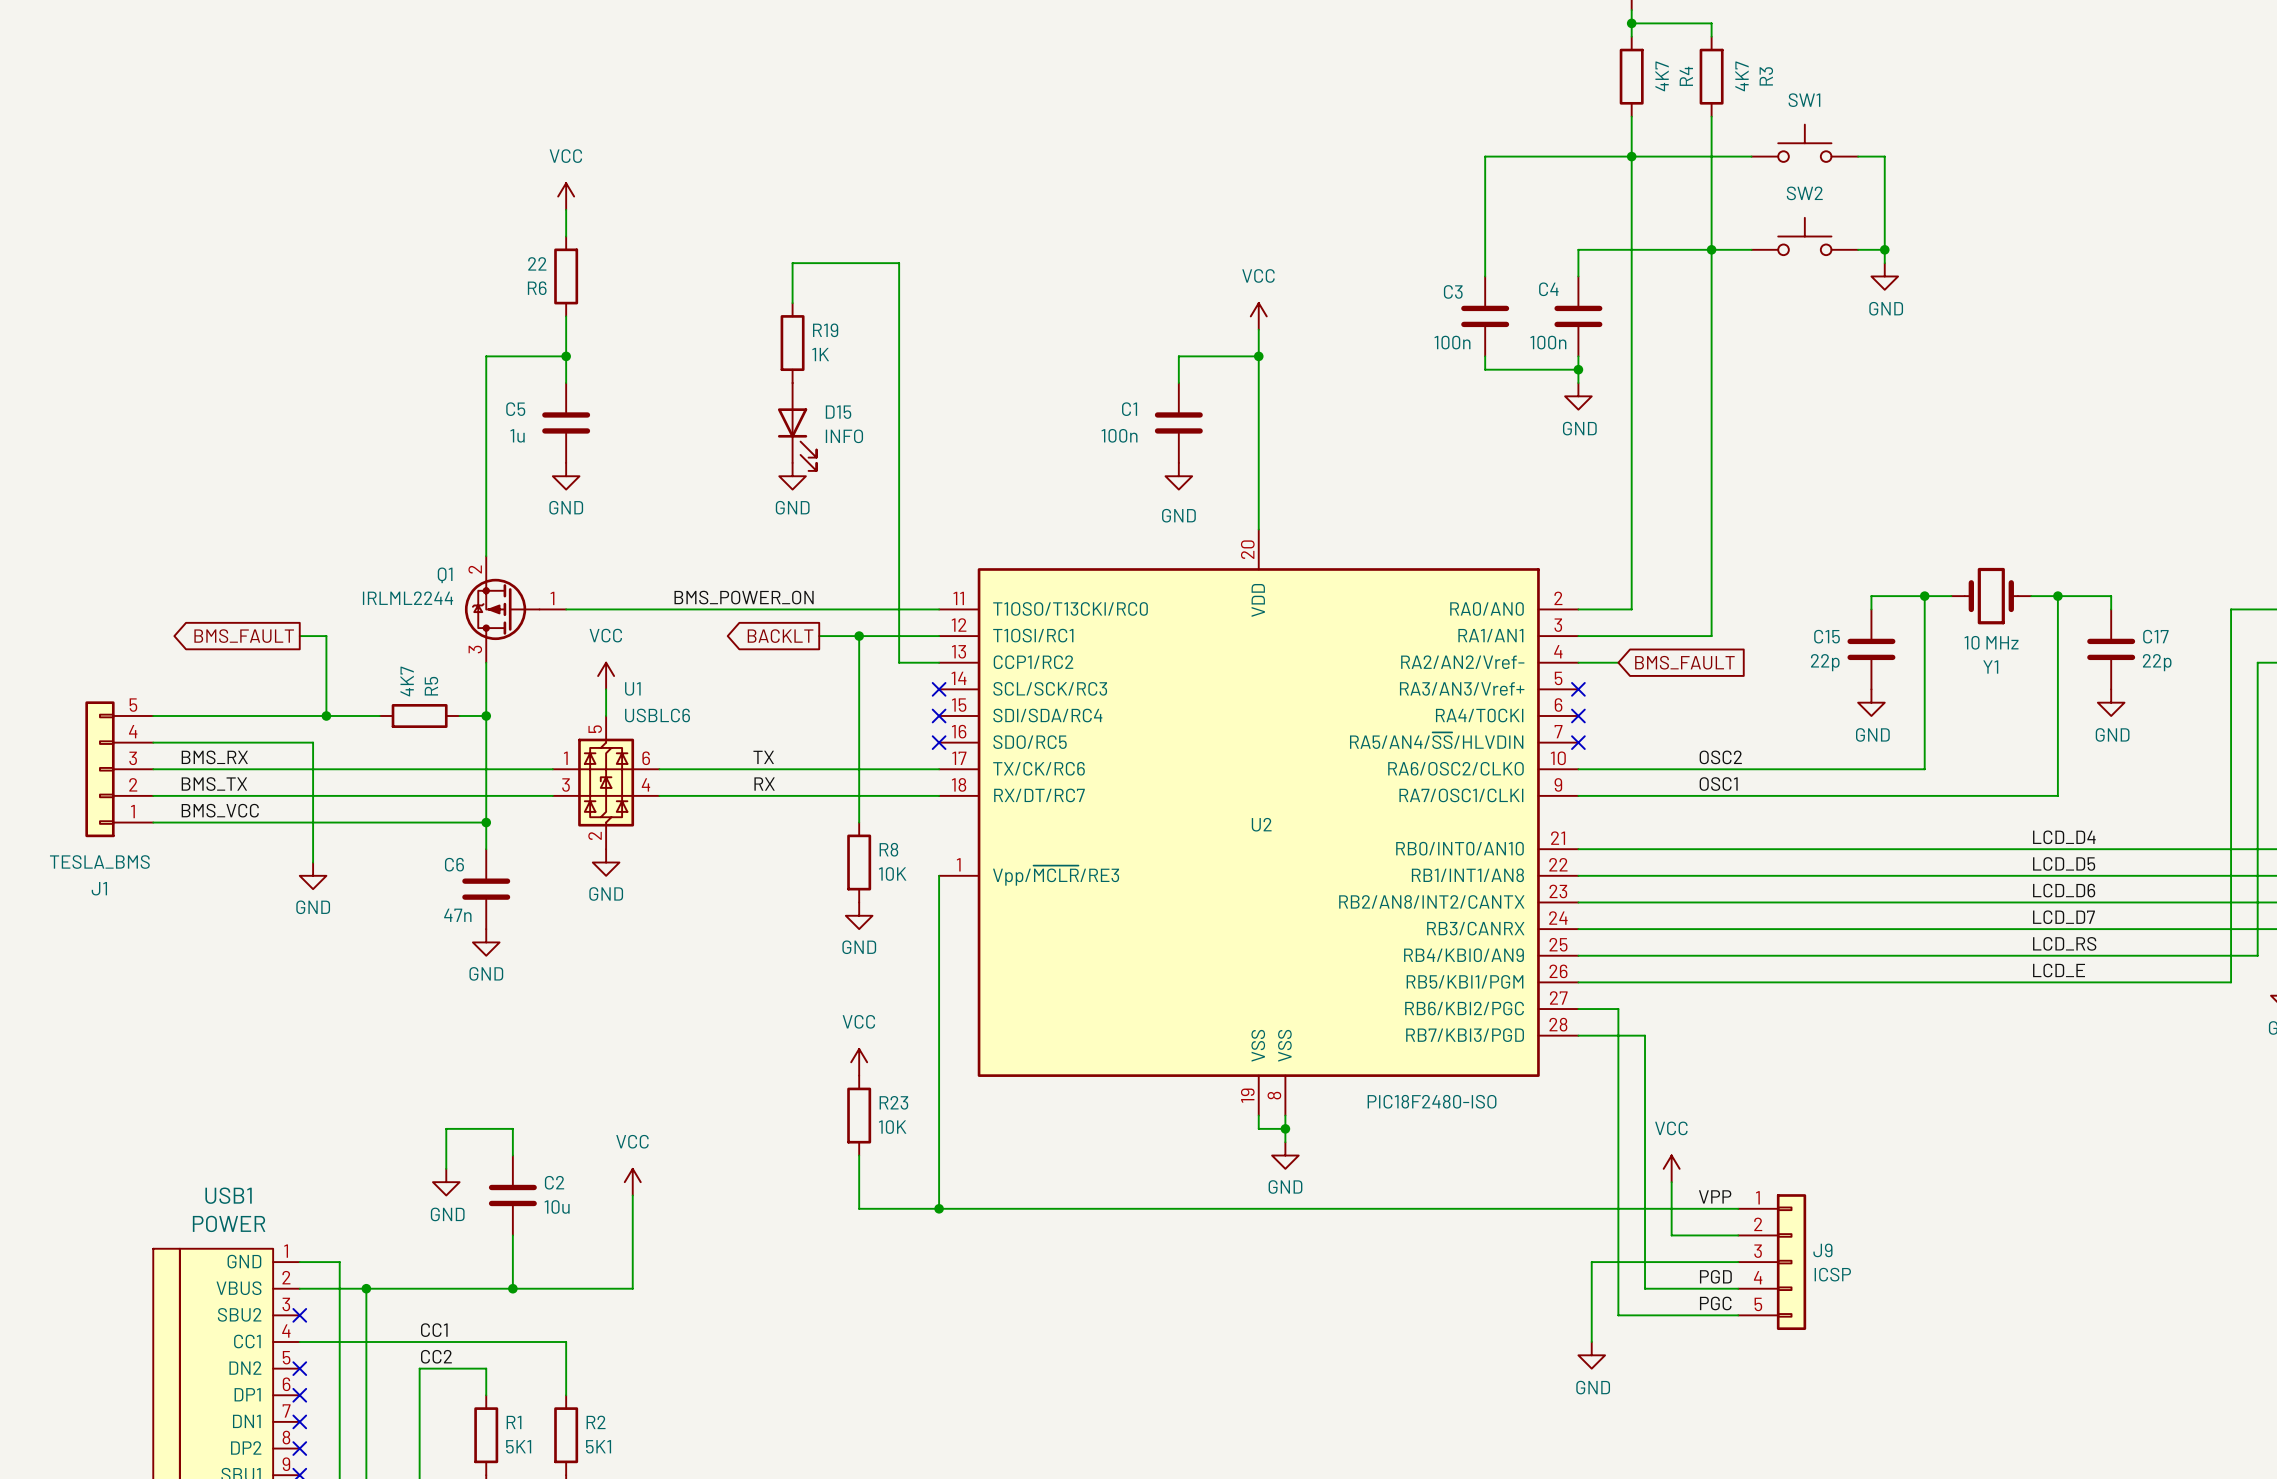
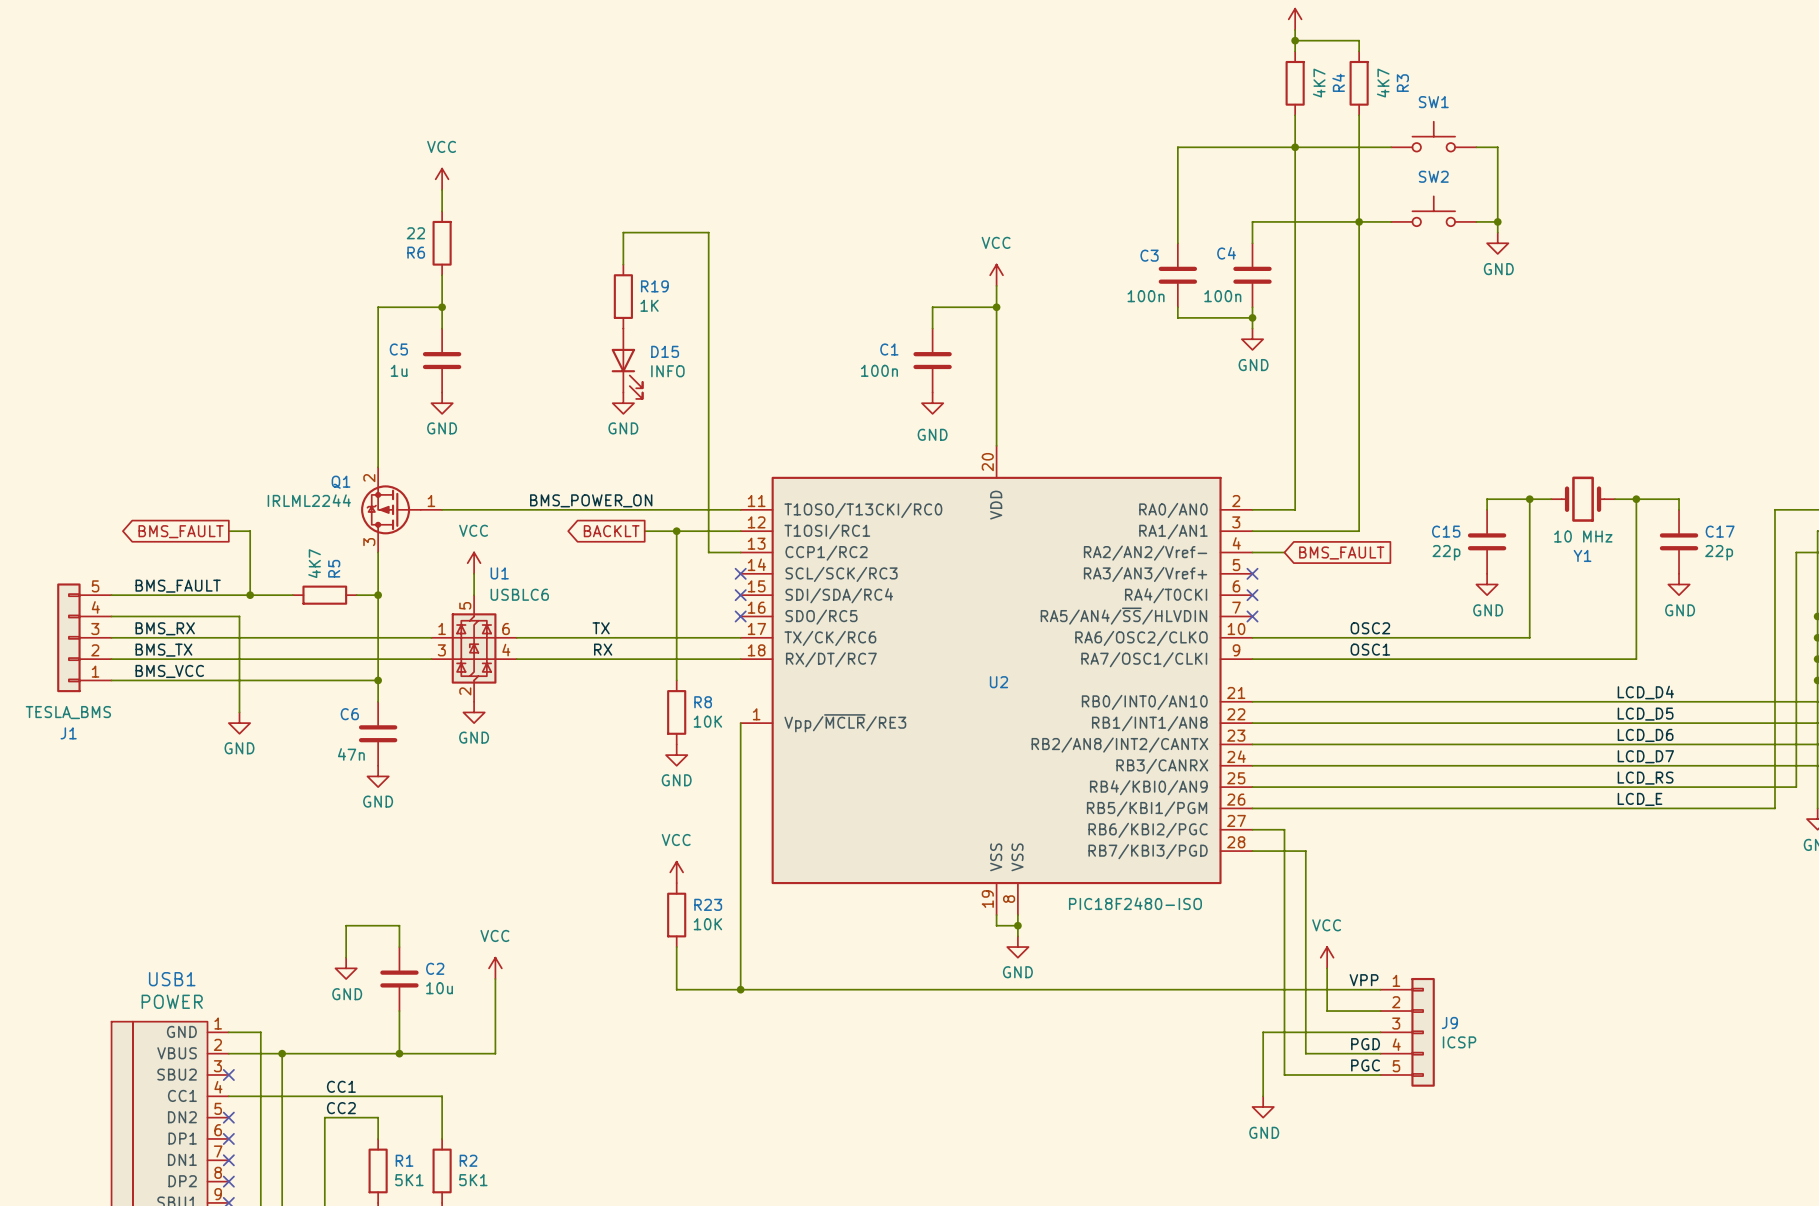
label: none -> BMS_FAULT (178, 586)

